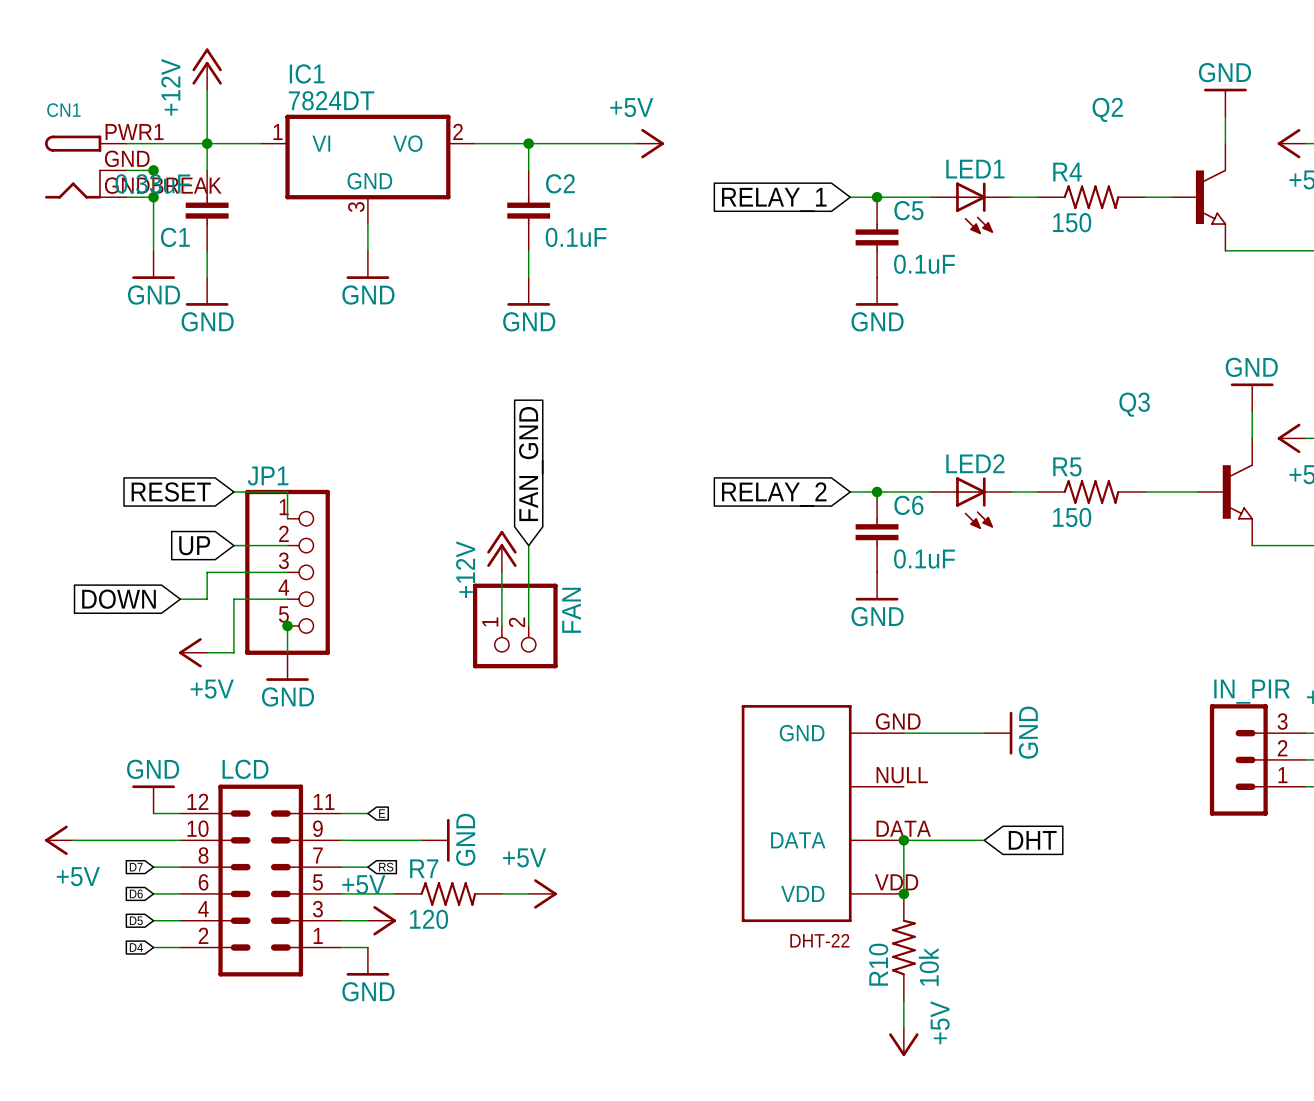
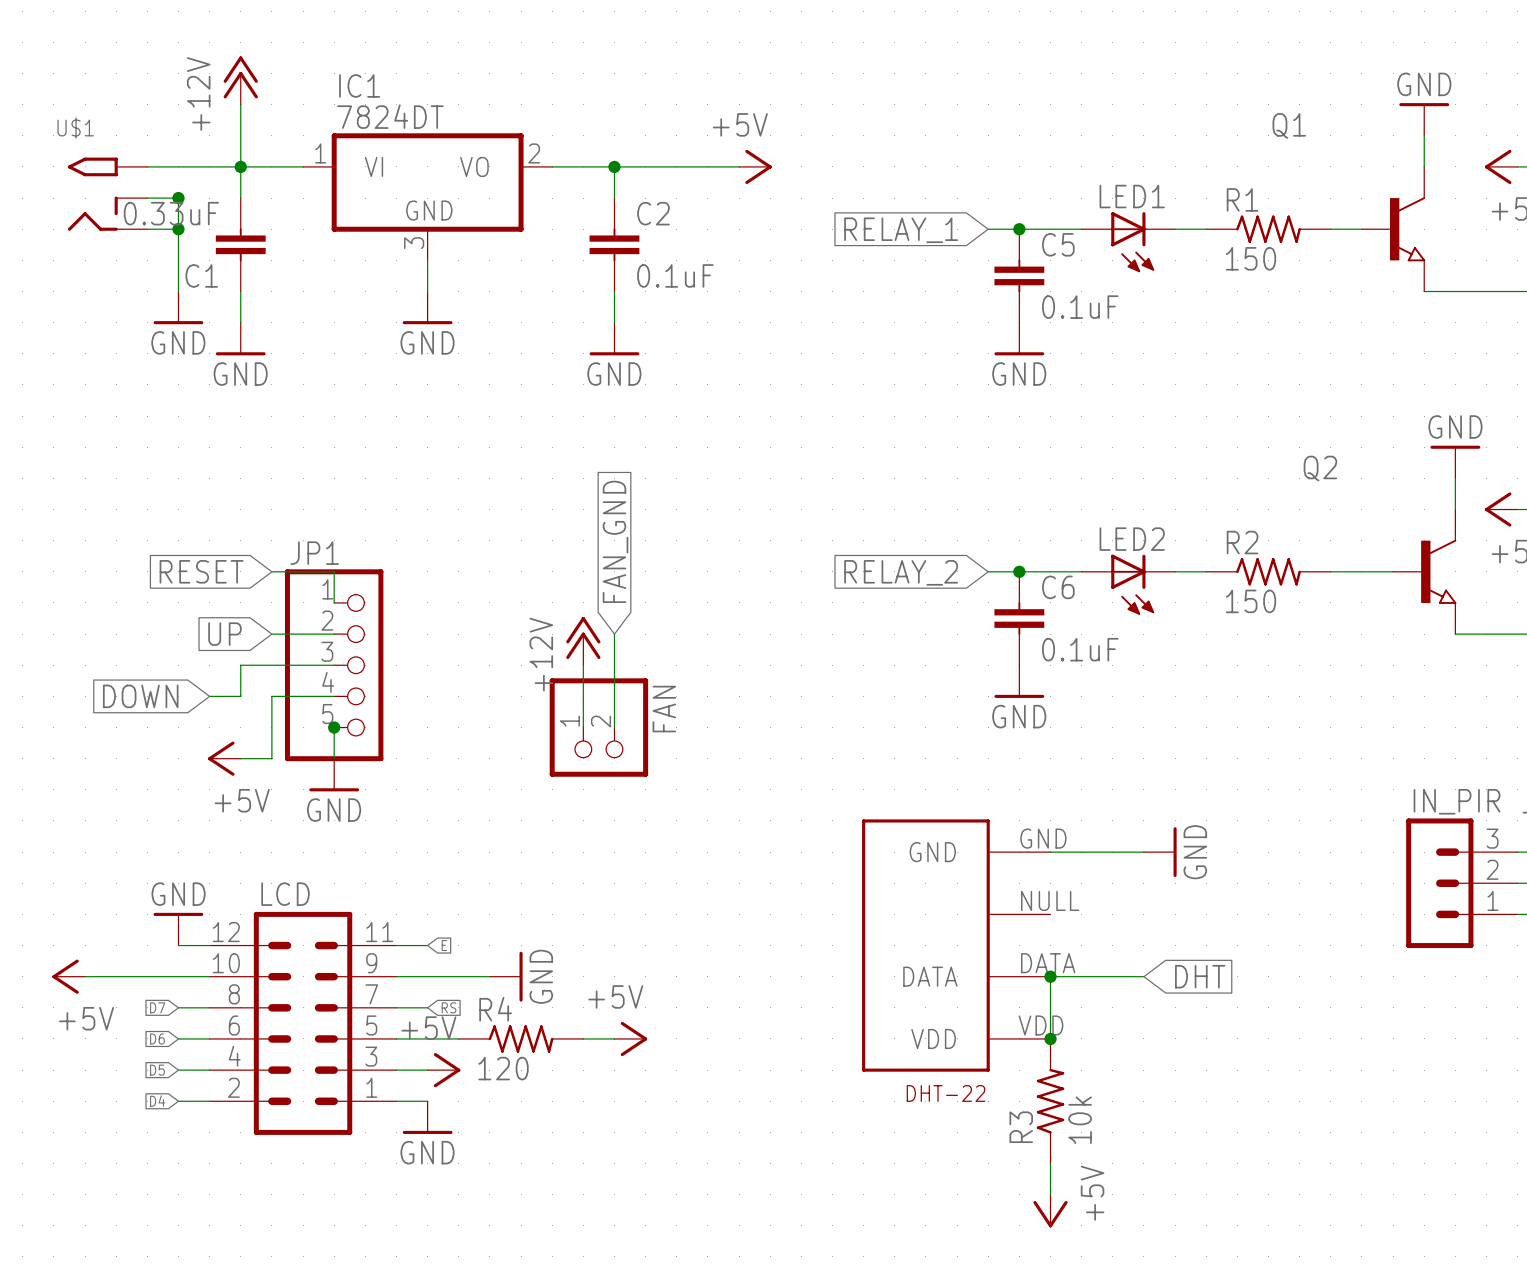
Q2 name: Q2 (1107, 109) -> Q1 (1289, 125)
CN1: (85, 167) -> none
U$1: none -> (107, 194)
R4 name: R4 (1067, 172) -> R1 (1242, 199)
Q3 name: Q3 (1134, 404) -> Q2 (1320, 468)
R5 name: R5 (1067, 466) -> R2 (1242, 542)
R7 name: R7 (424, 868) -> R4 (495, 1009)
R10 name: R10 (878, 964) -> R3 (1021, 1127)

